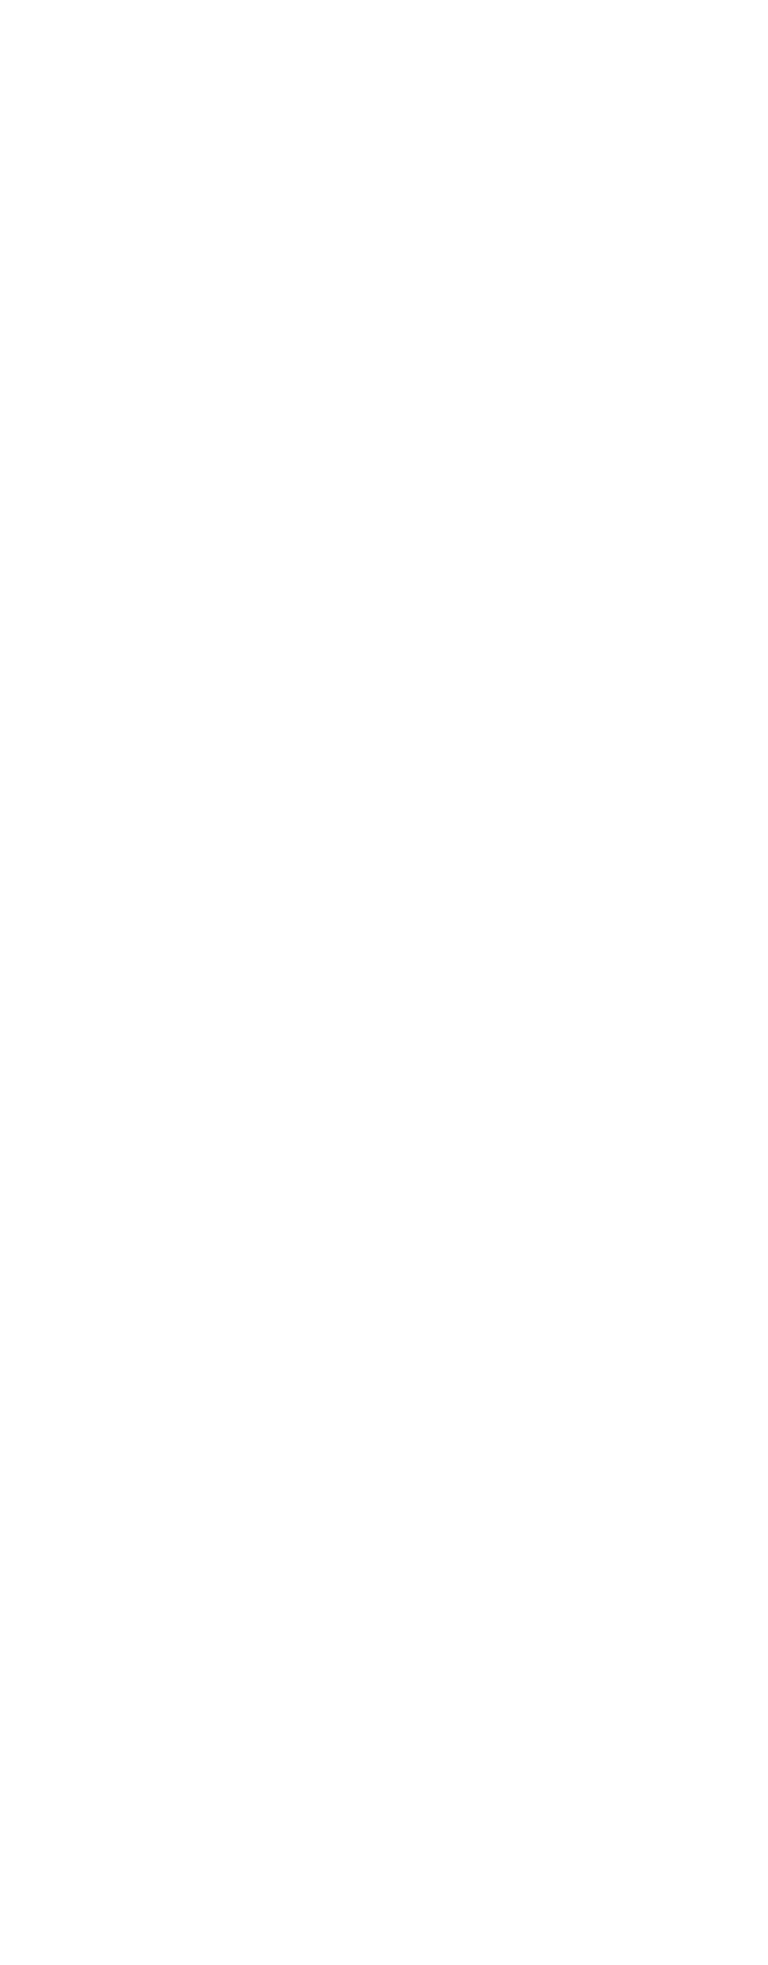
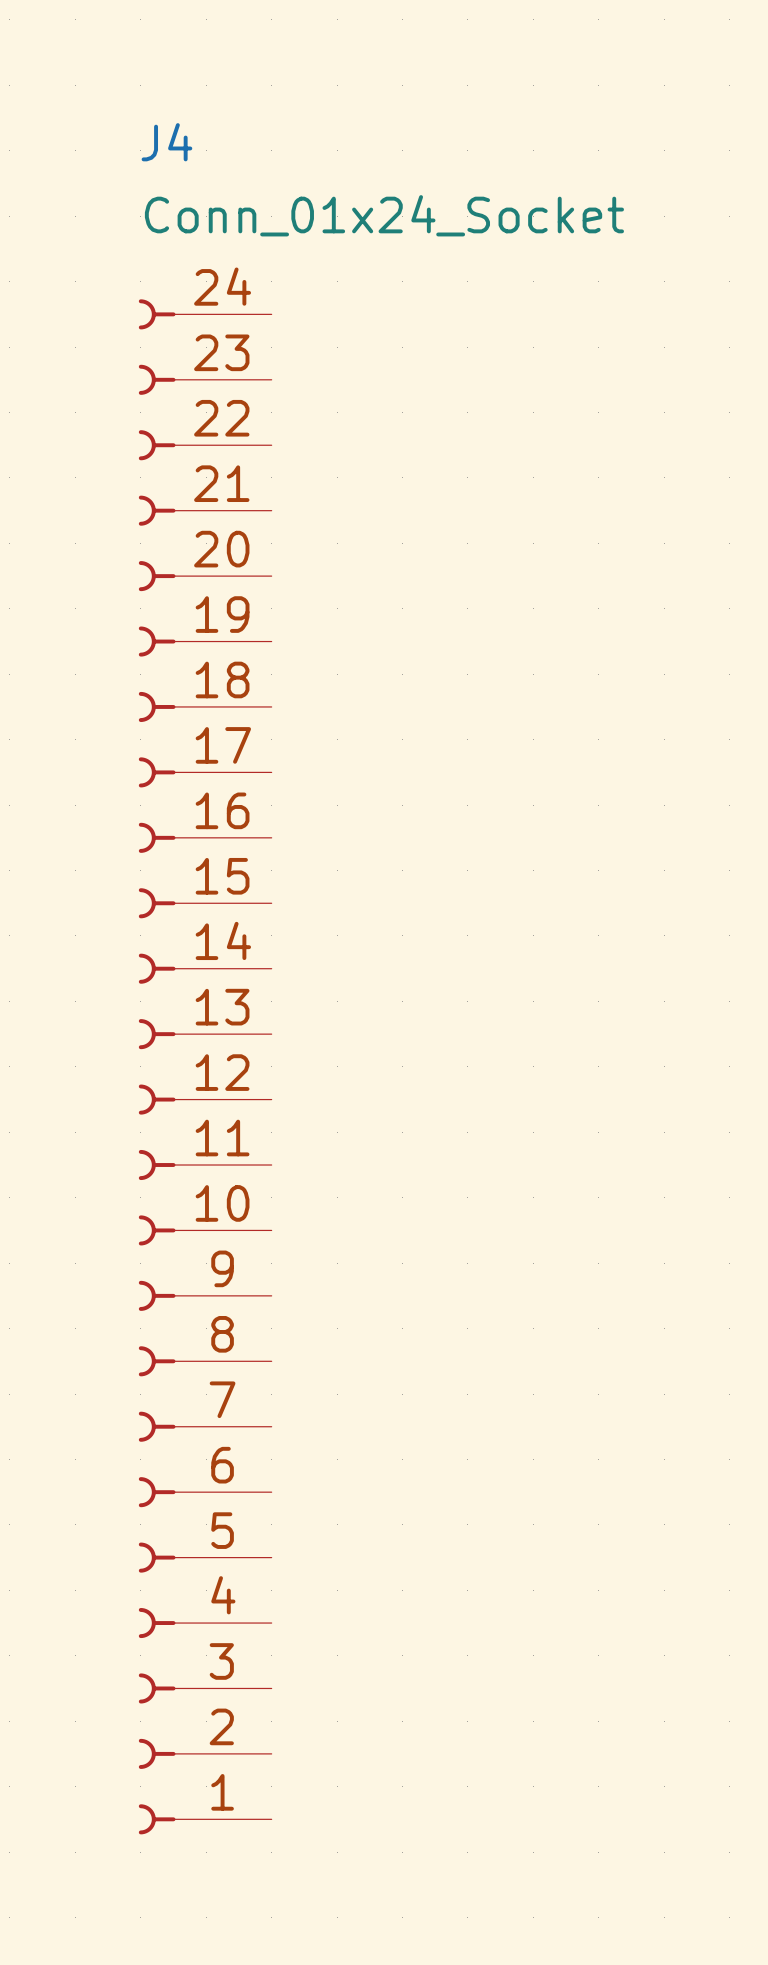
J4: none -> Conn_01x24_Socket (205, 1066)

